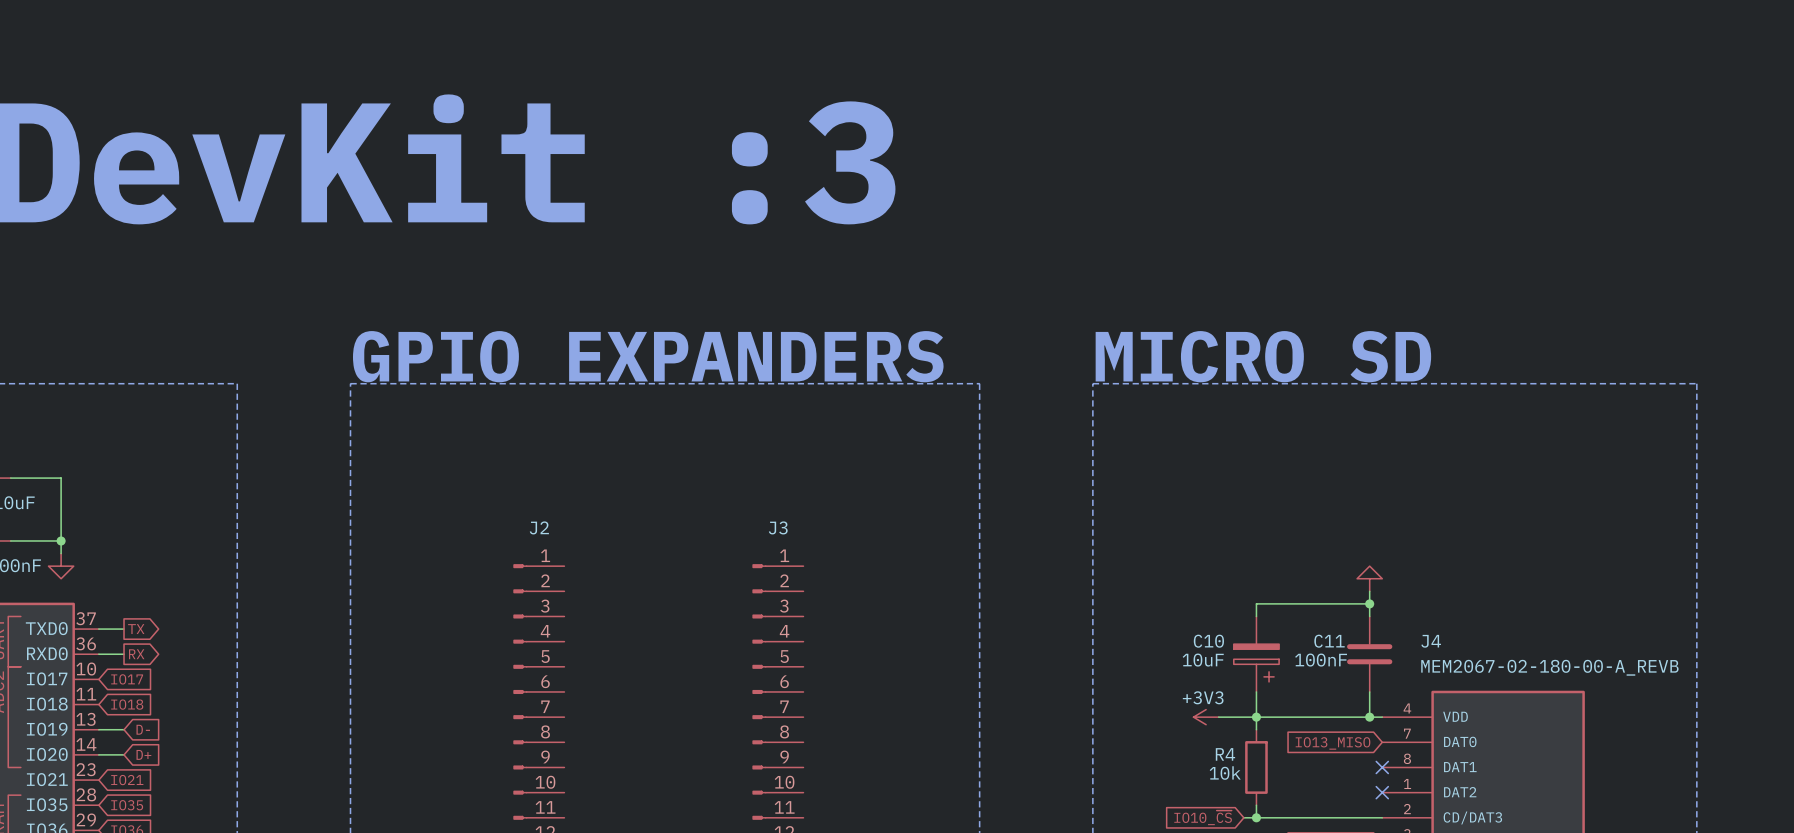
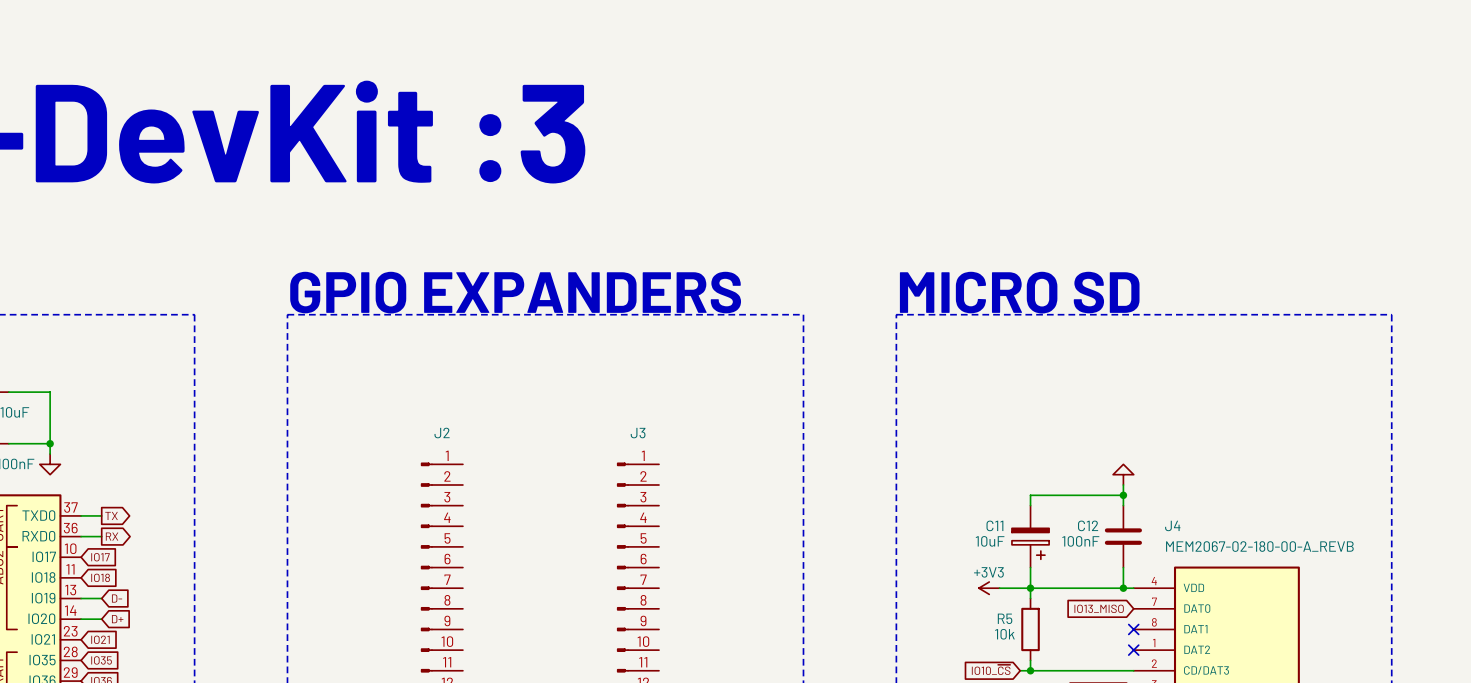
C10 name: C10 (1208, 641) -> C11 (994, 525)
C11 name: C11 (1329, 641) -> C12 (1088, 525)
R4 name: R4 (1225, 754) -> R5 (1005, 618)

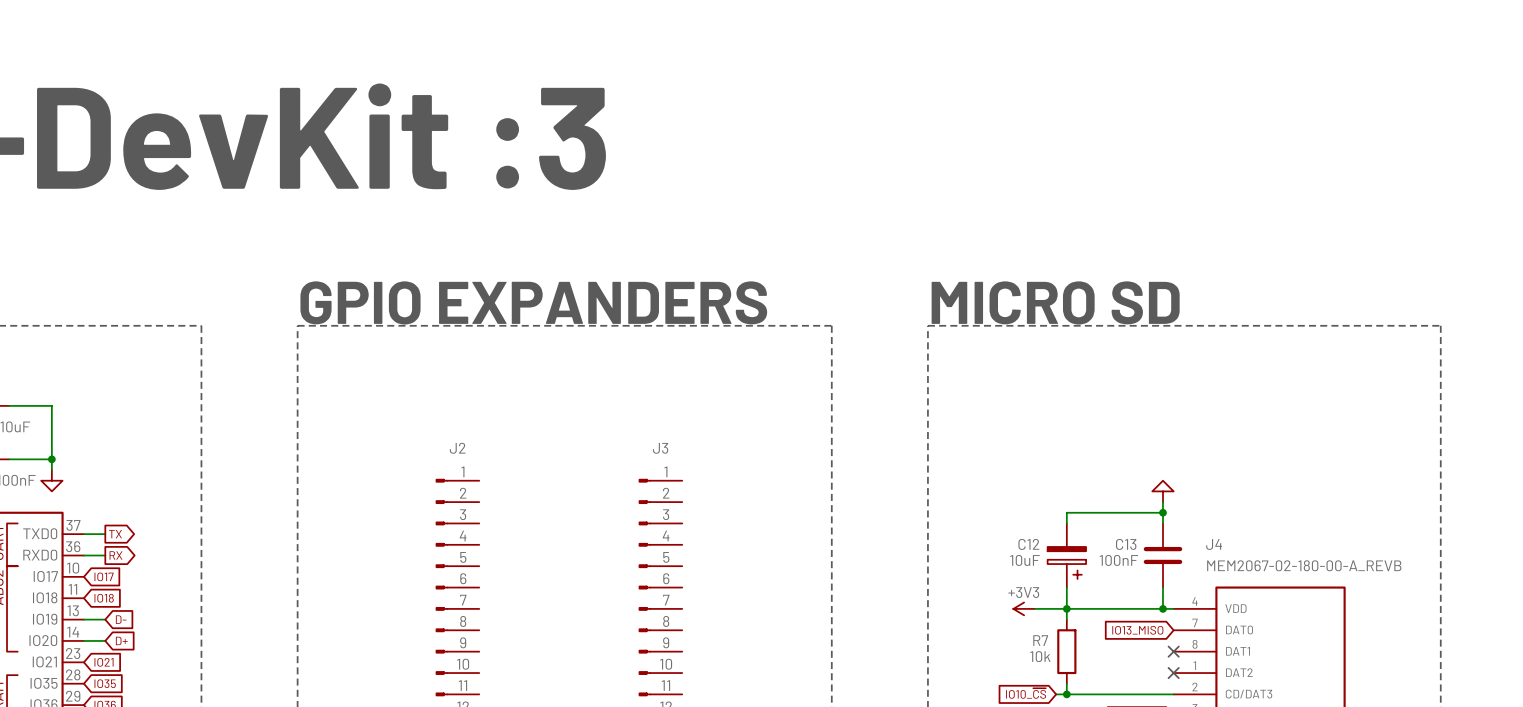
C11 name: C11 (994, 525) -> C12 (1028, 544)
C12 name: C12 (1088, 525) -> C13 (1126, 544)
R5 name: R5 (1005, 618) -> R7 (1040, 640)

